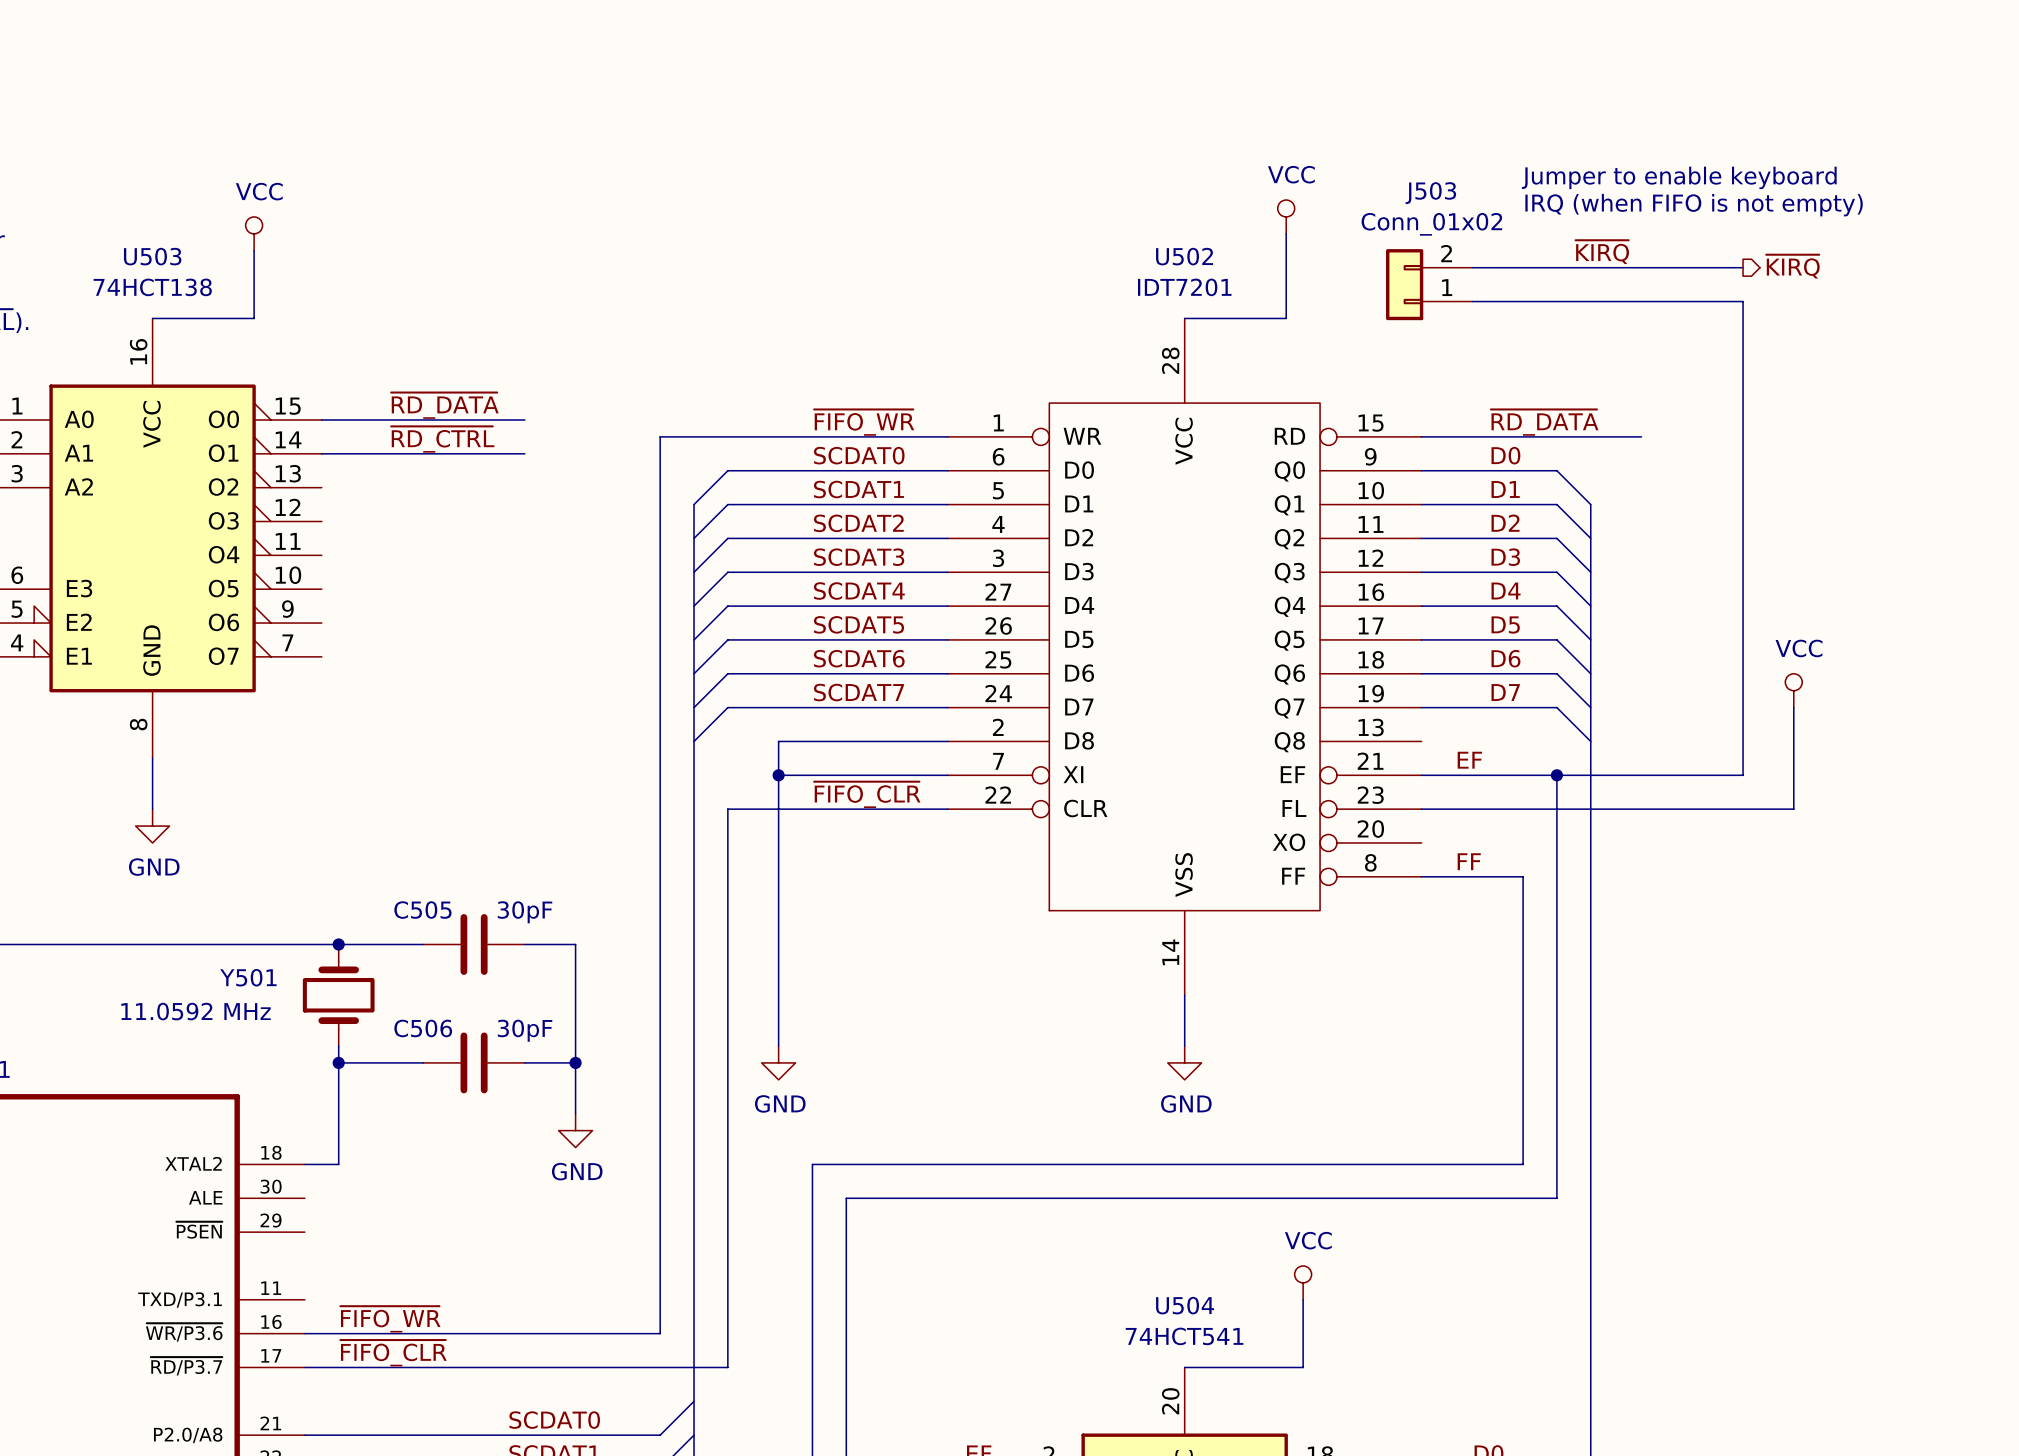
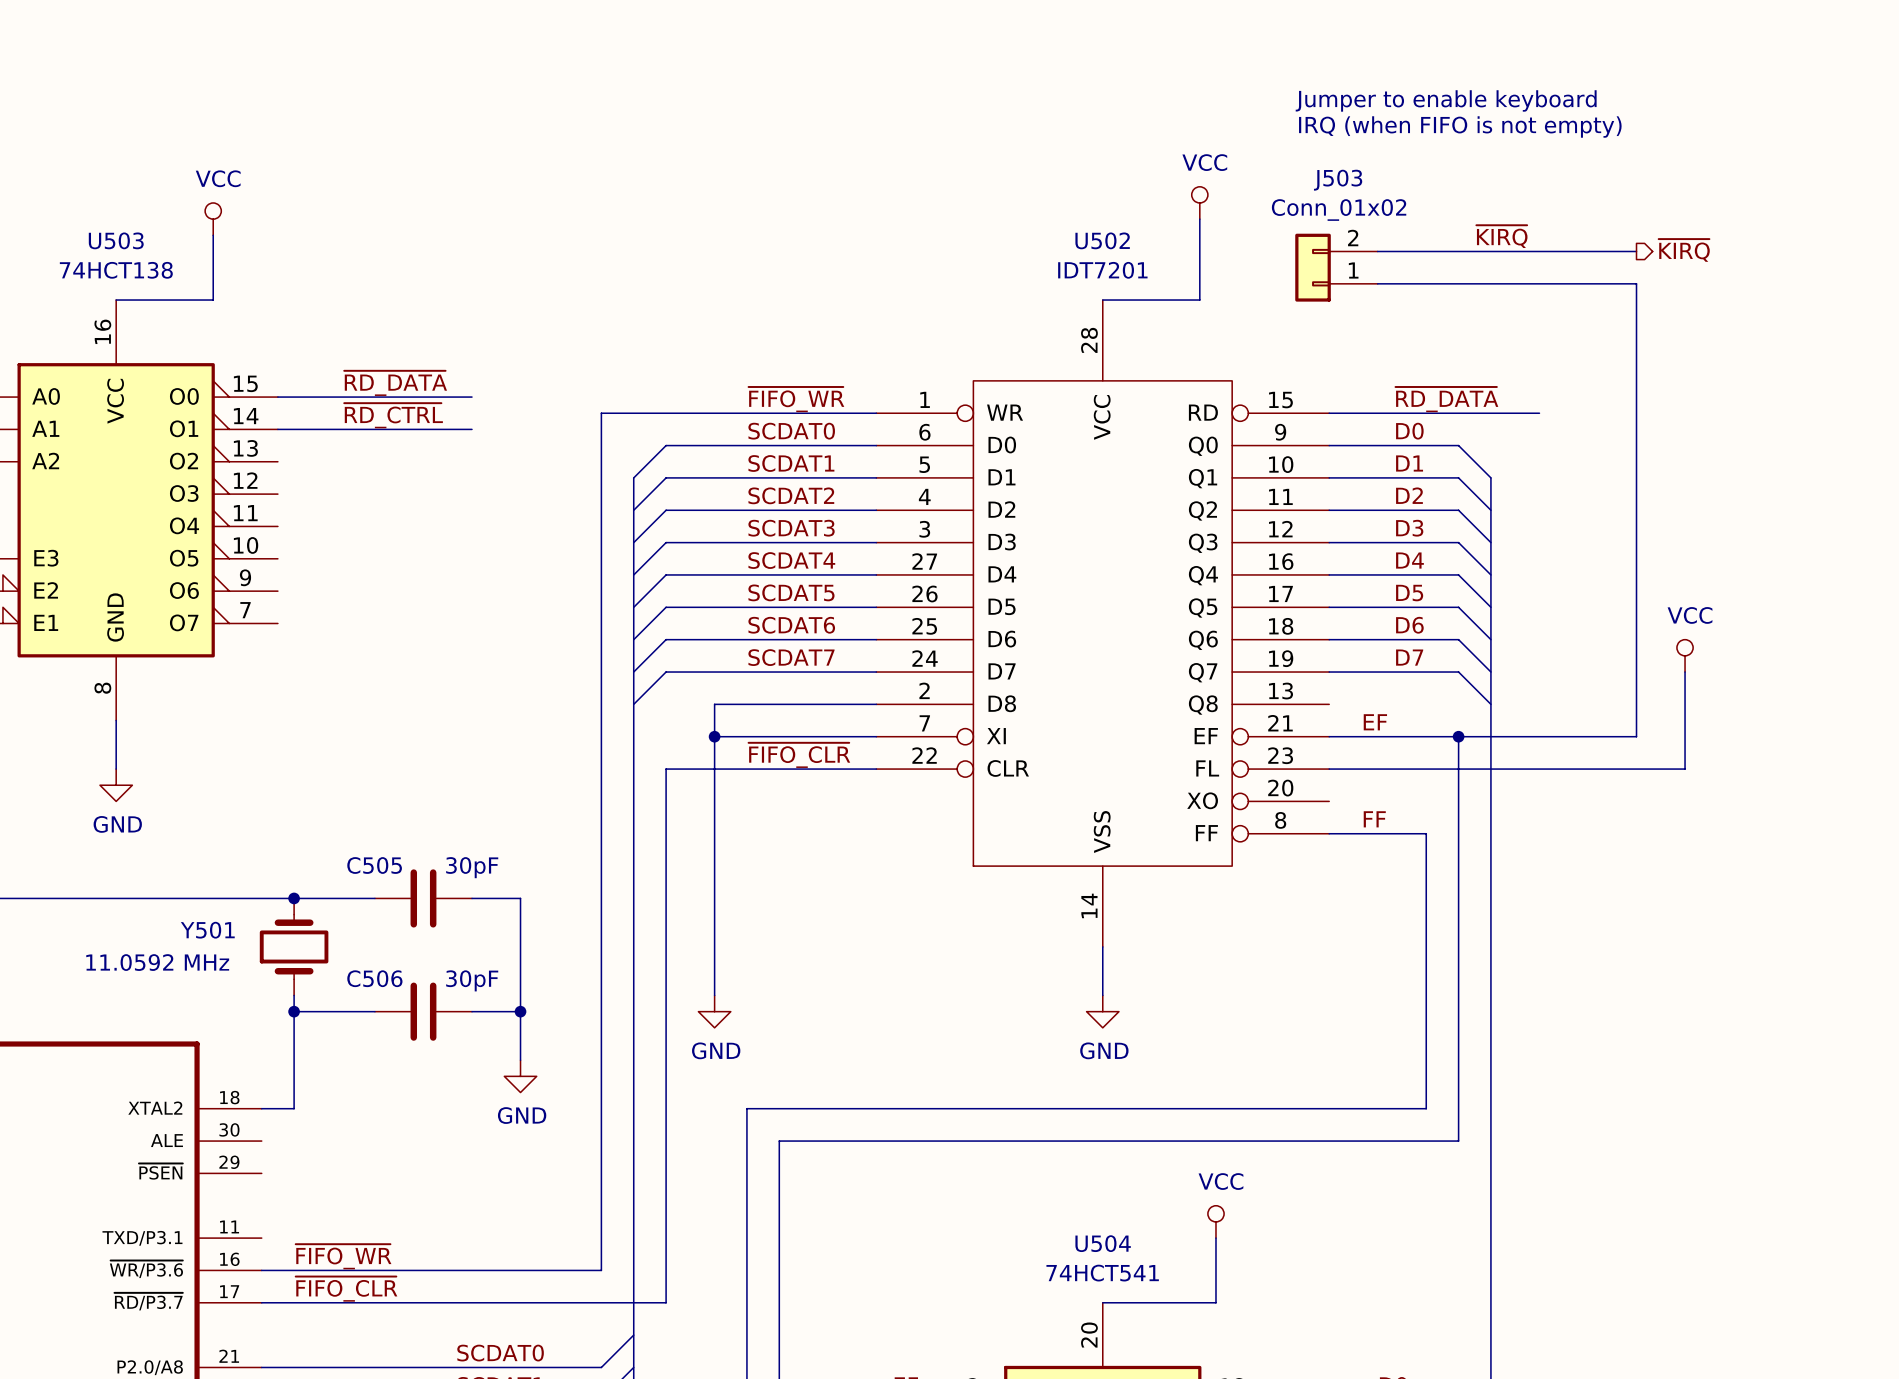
text position: Jumper to enable keyboard (1679, 177) -> Jumper to enable keyboard (1446, 100)
text position: IRQ (when FIFO is not empty) (1694, 205) -> IRQ (when FIFO is not empty) (1460, 126)

